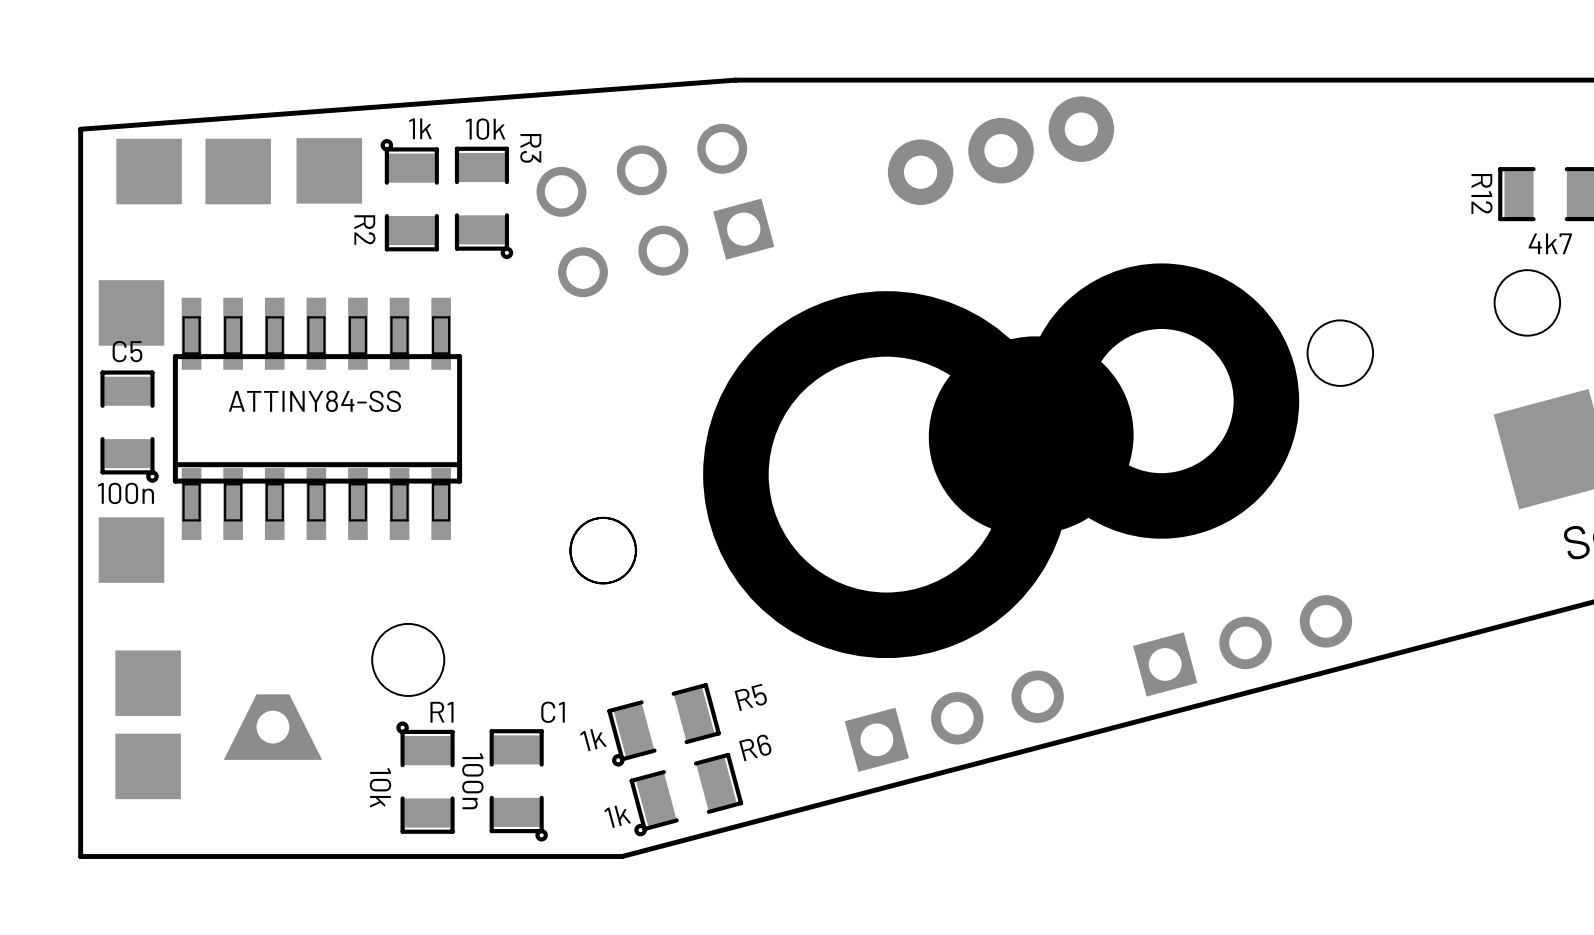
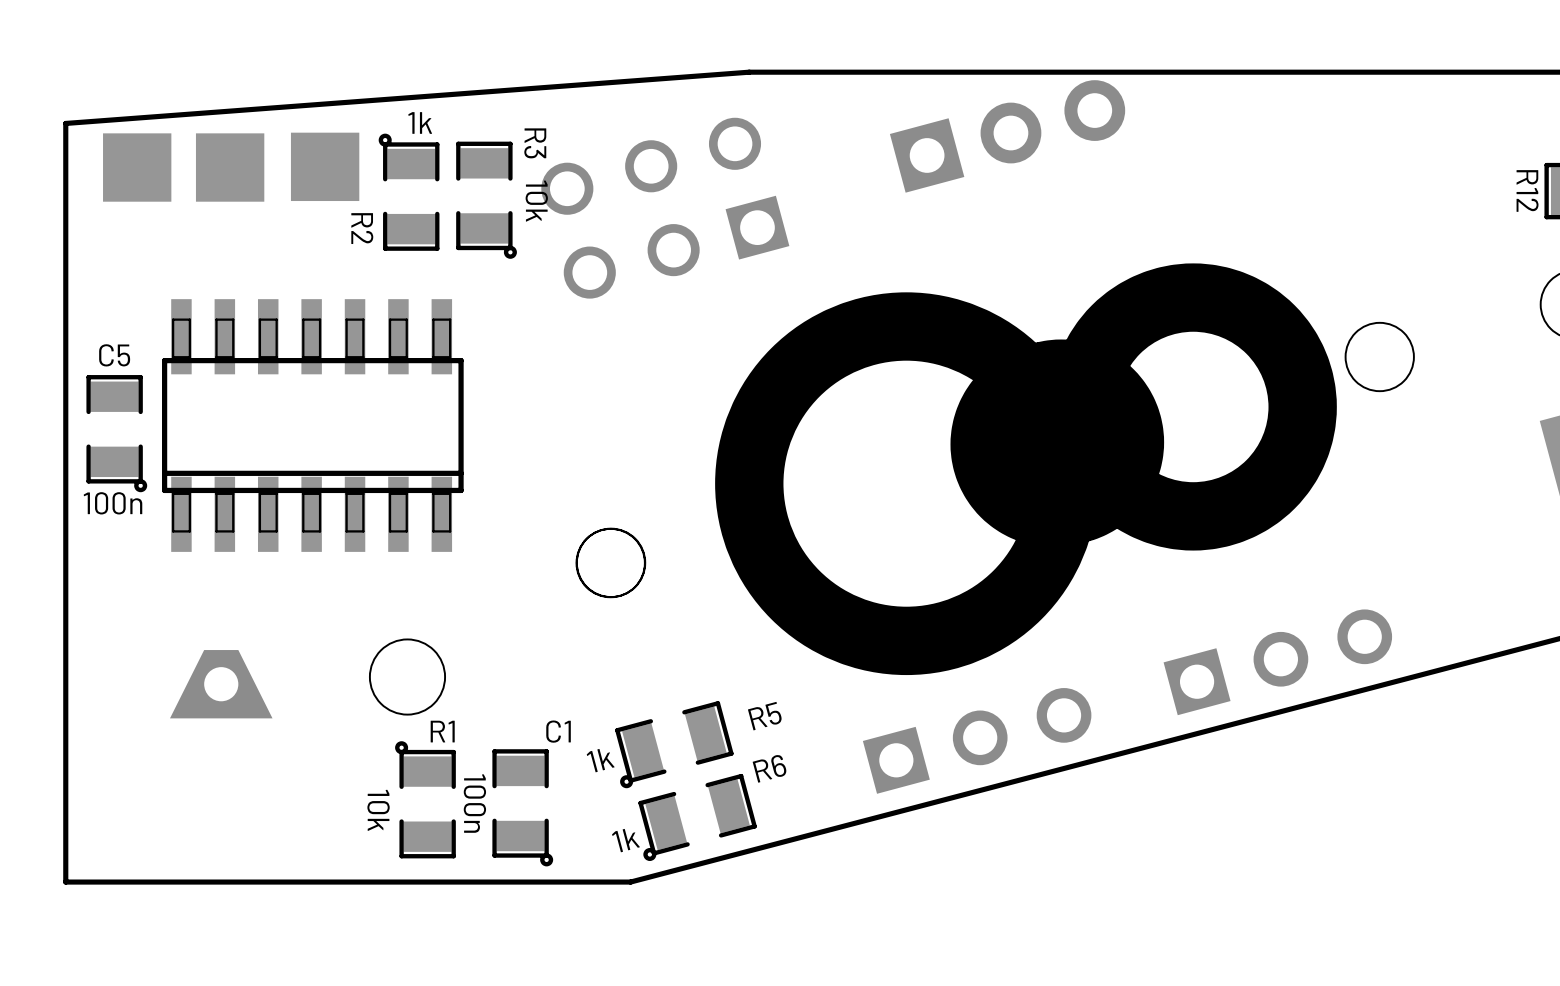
part footprint: [887, 96, 1115, 205] -> [889, 80, 1126, 193]
R3 value rotation: 0° (485, 129) -> 90° clockwise (536, 201)
R3 value position: 10k (485, 129) -> 10k (536, 201)
part: (131, 312) -> none
part value: ATTINY84-SS (314, 401) -> none
part: (131, 550) -> none
part: (148, 683) -> none
part position: (272, 727) -> (221, 684)
part: (148, 766) -> none

